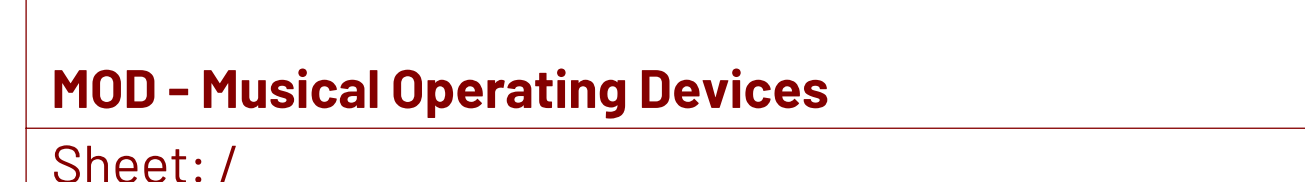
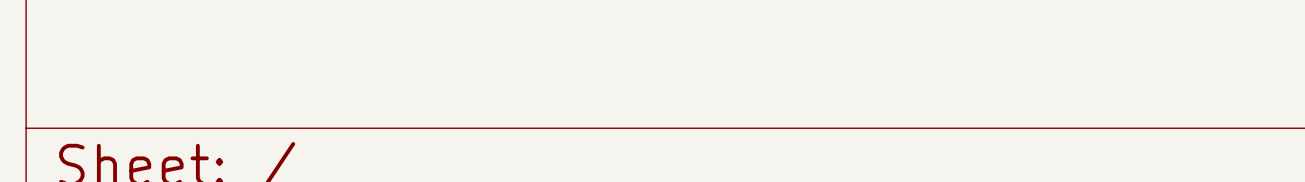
title block: MOD - Musical Operating Devices (440, 93) -> none

